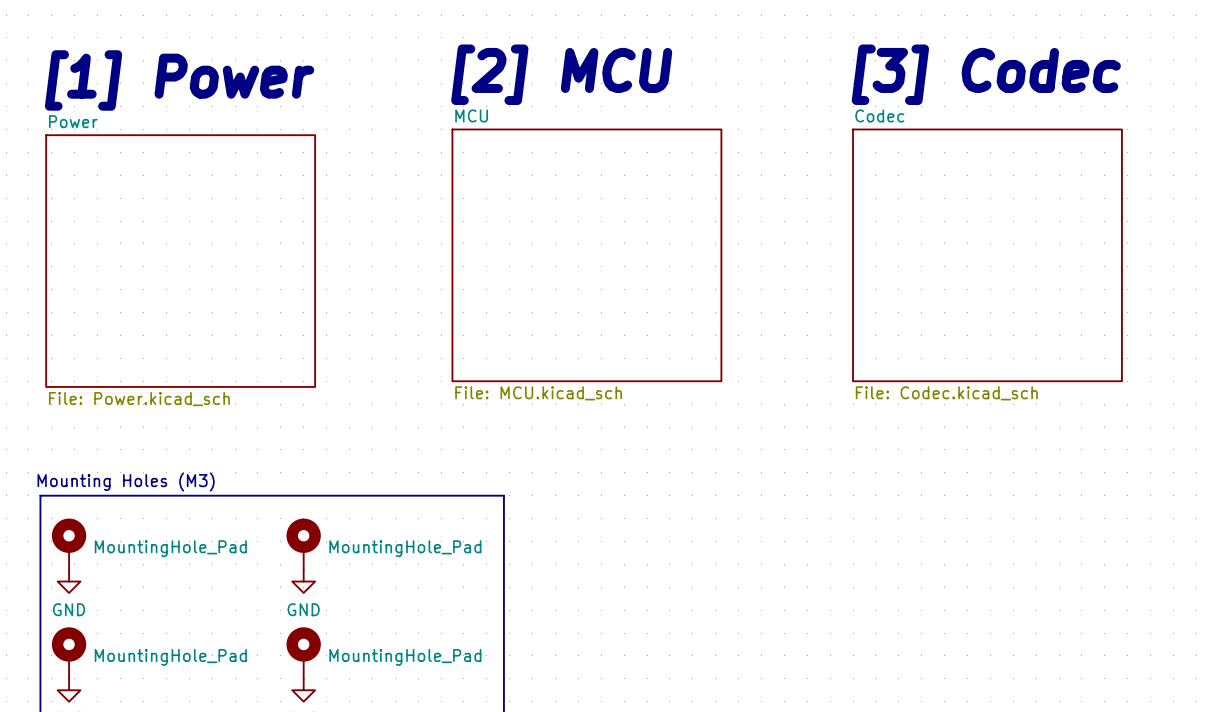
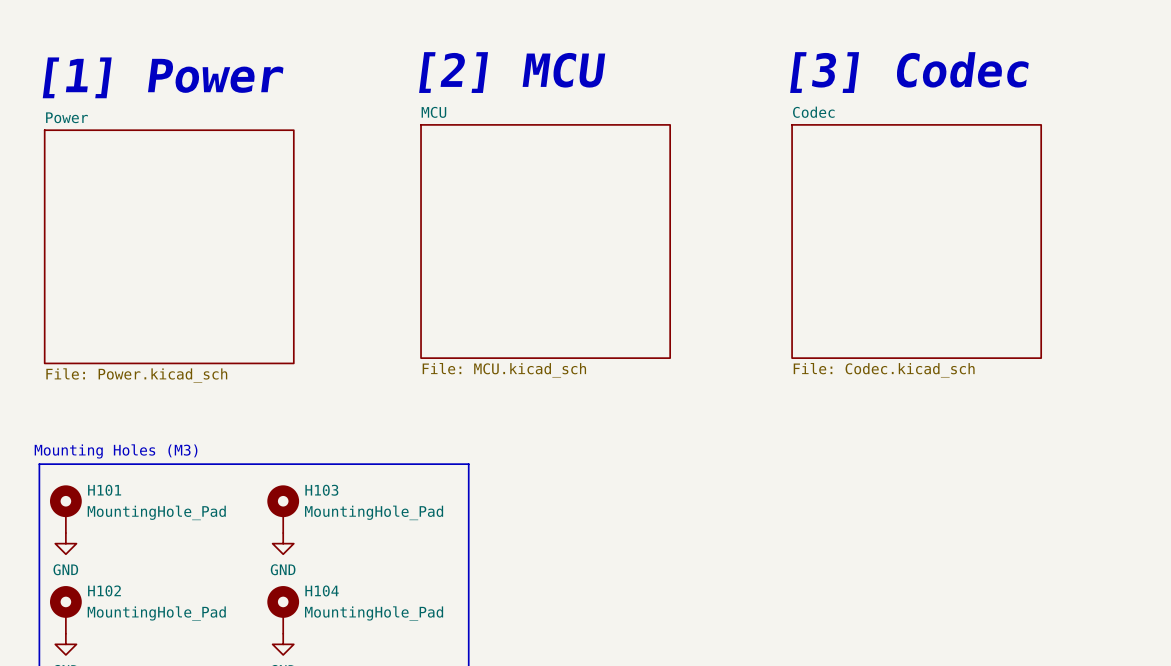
H101 name: none -> H101 (104, 490)
H103 name: none -> H103 (321, 490)
H102 name: none -> H102 (104, 590)
H104 name: none -> H104 (322, 590)

